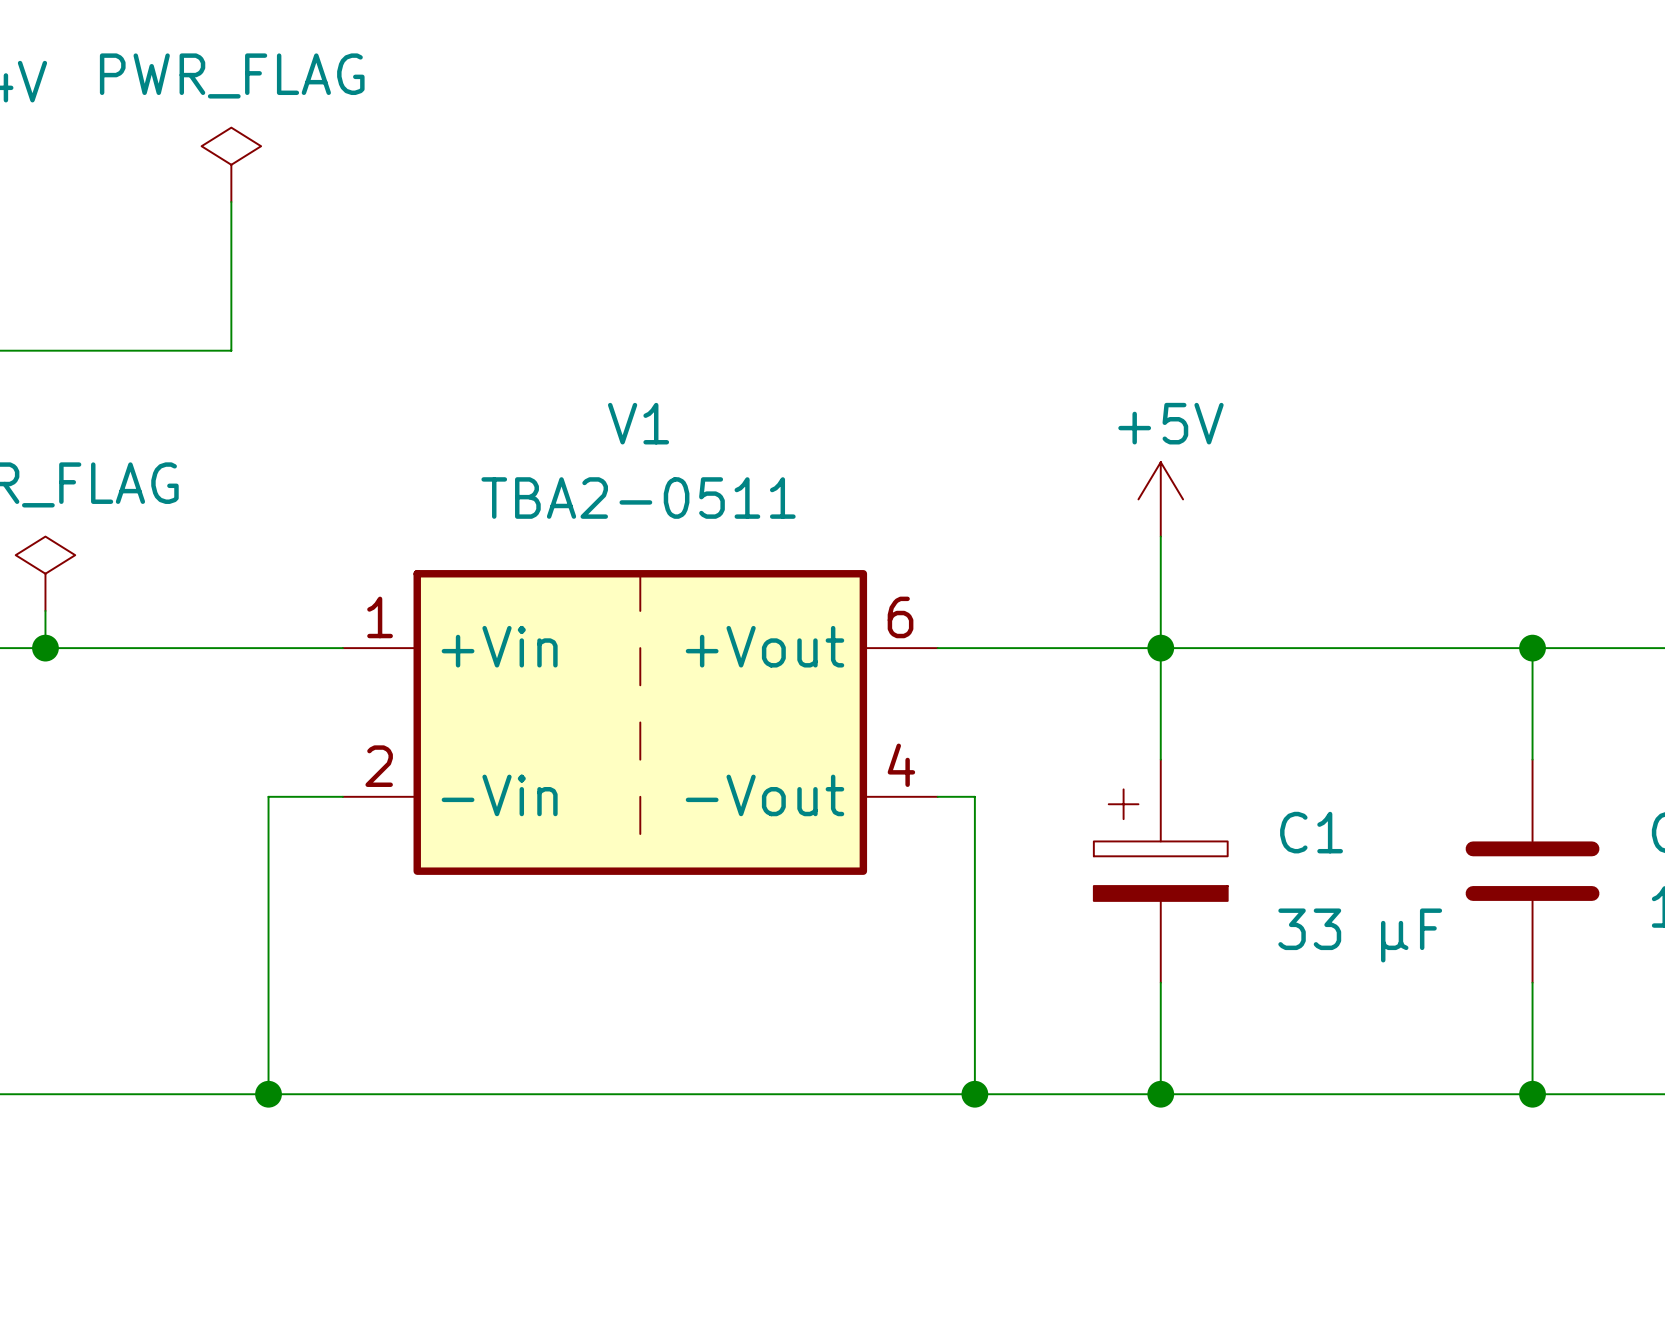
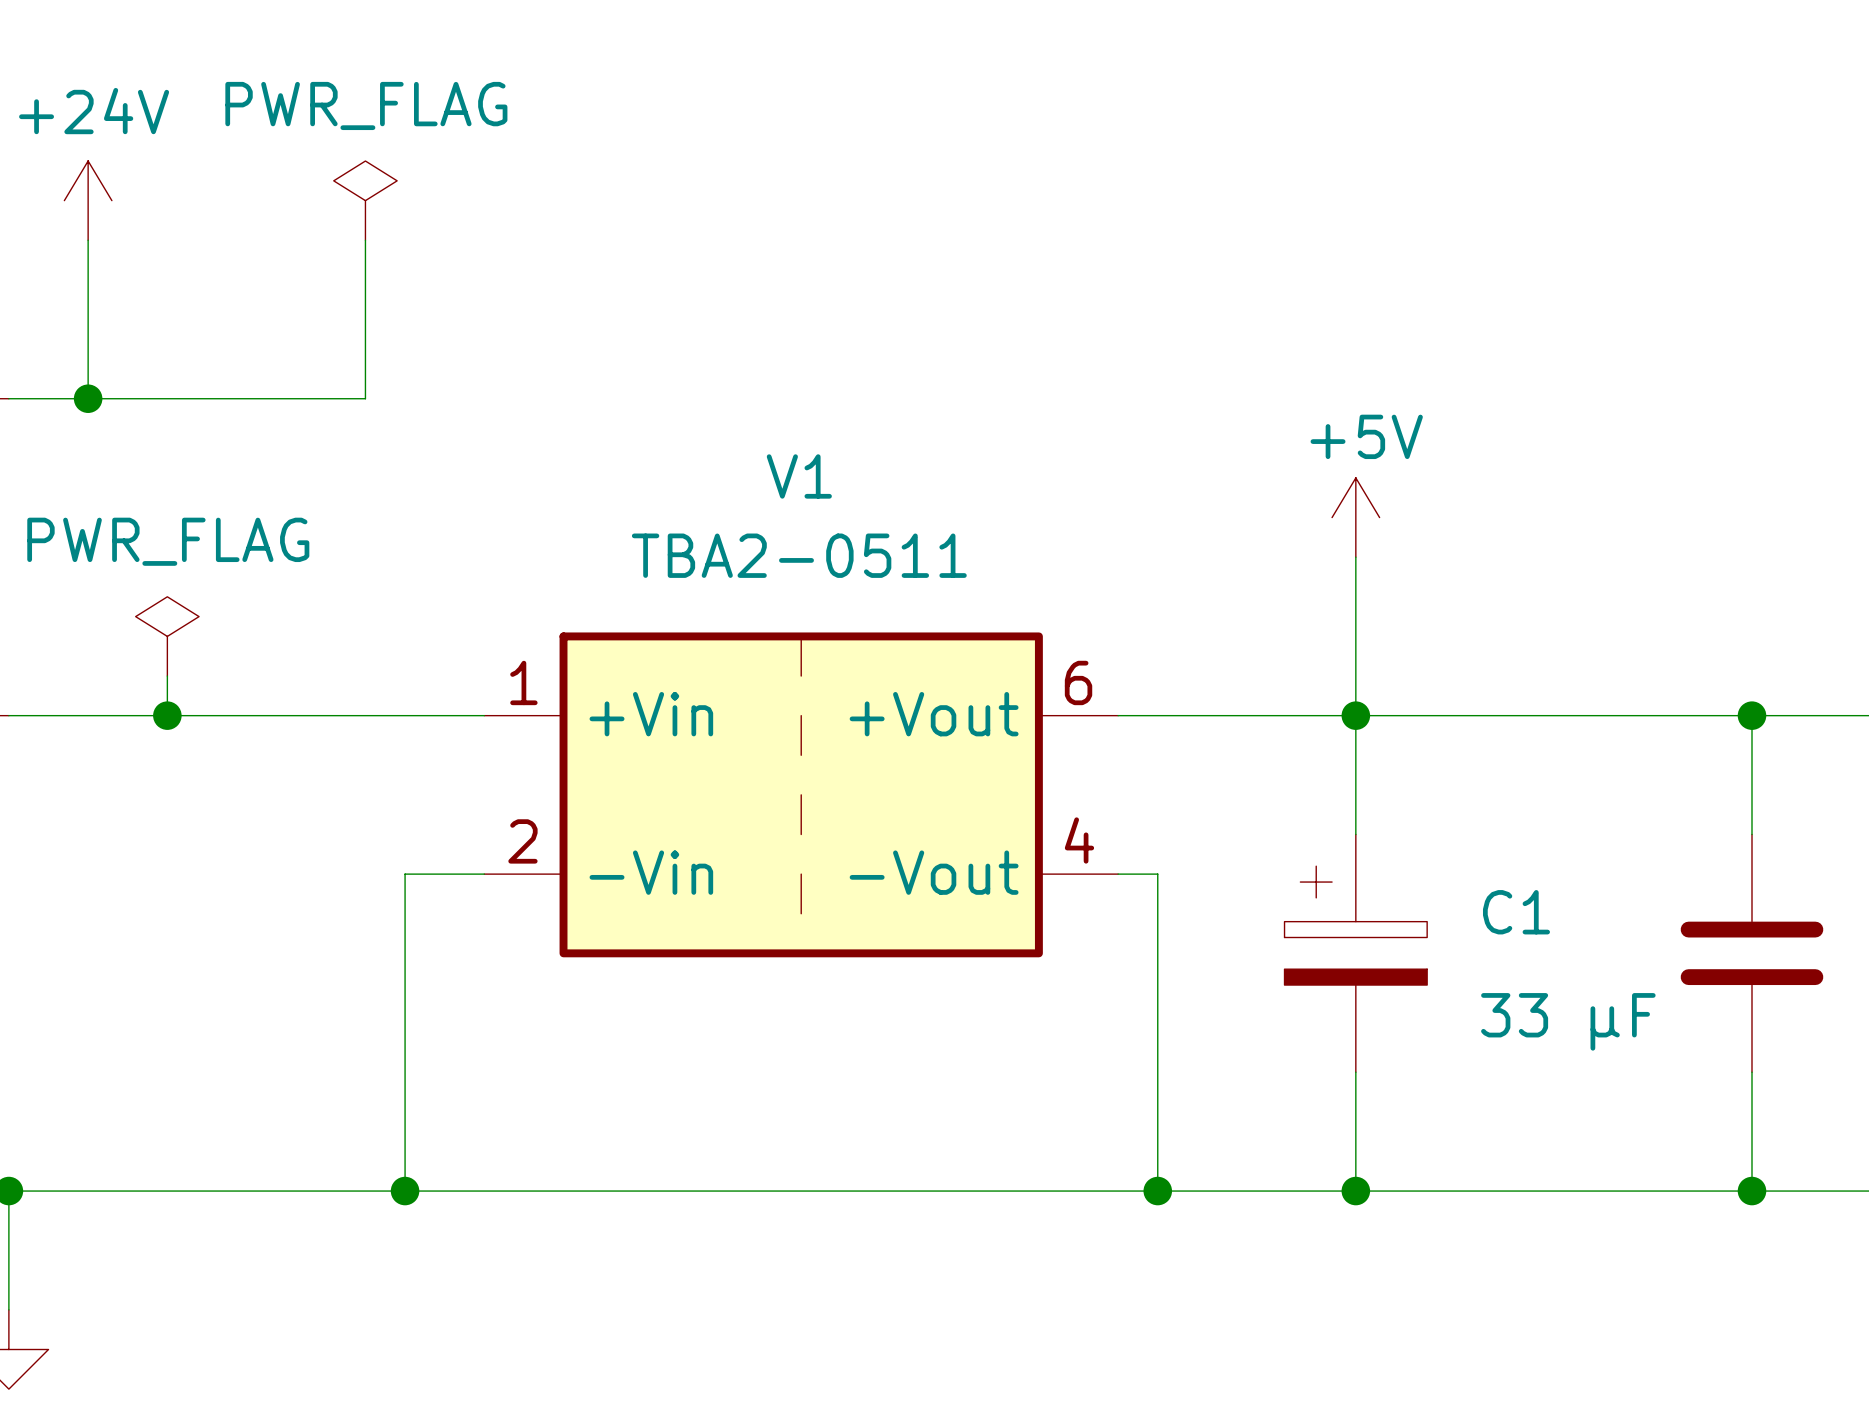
power symbol position: +5V (1160, 499) -> +5V (1355, 517)

